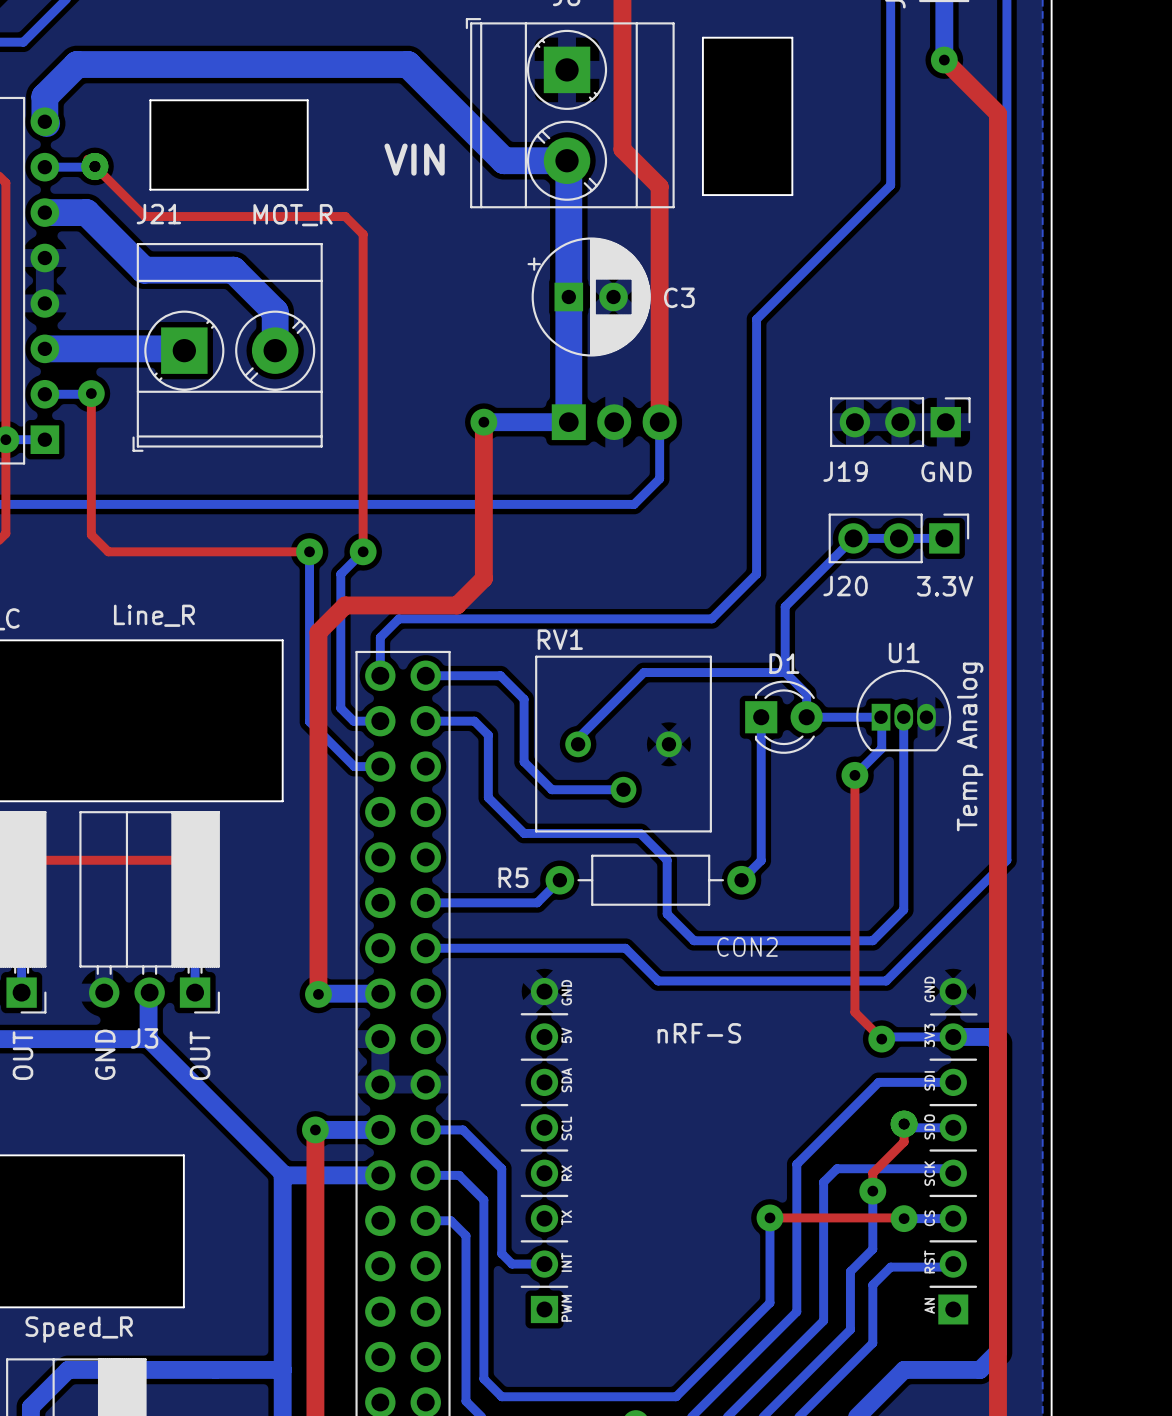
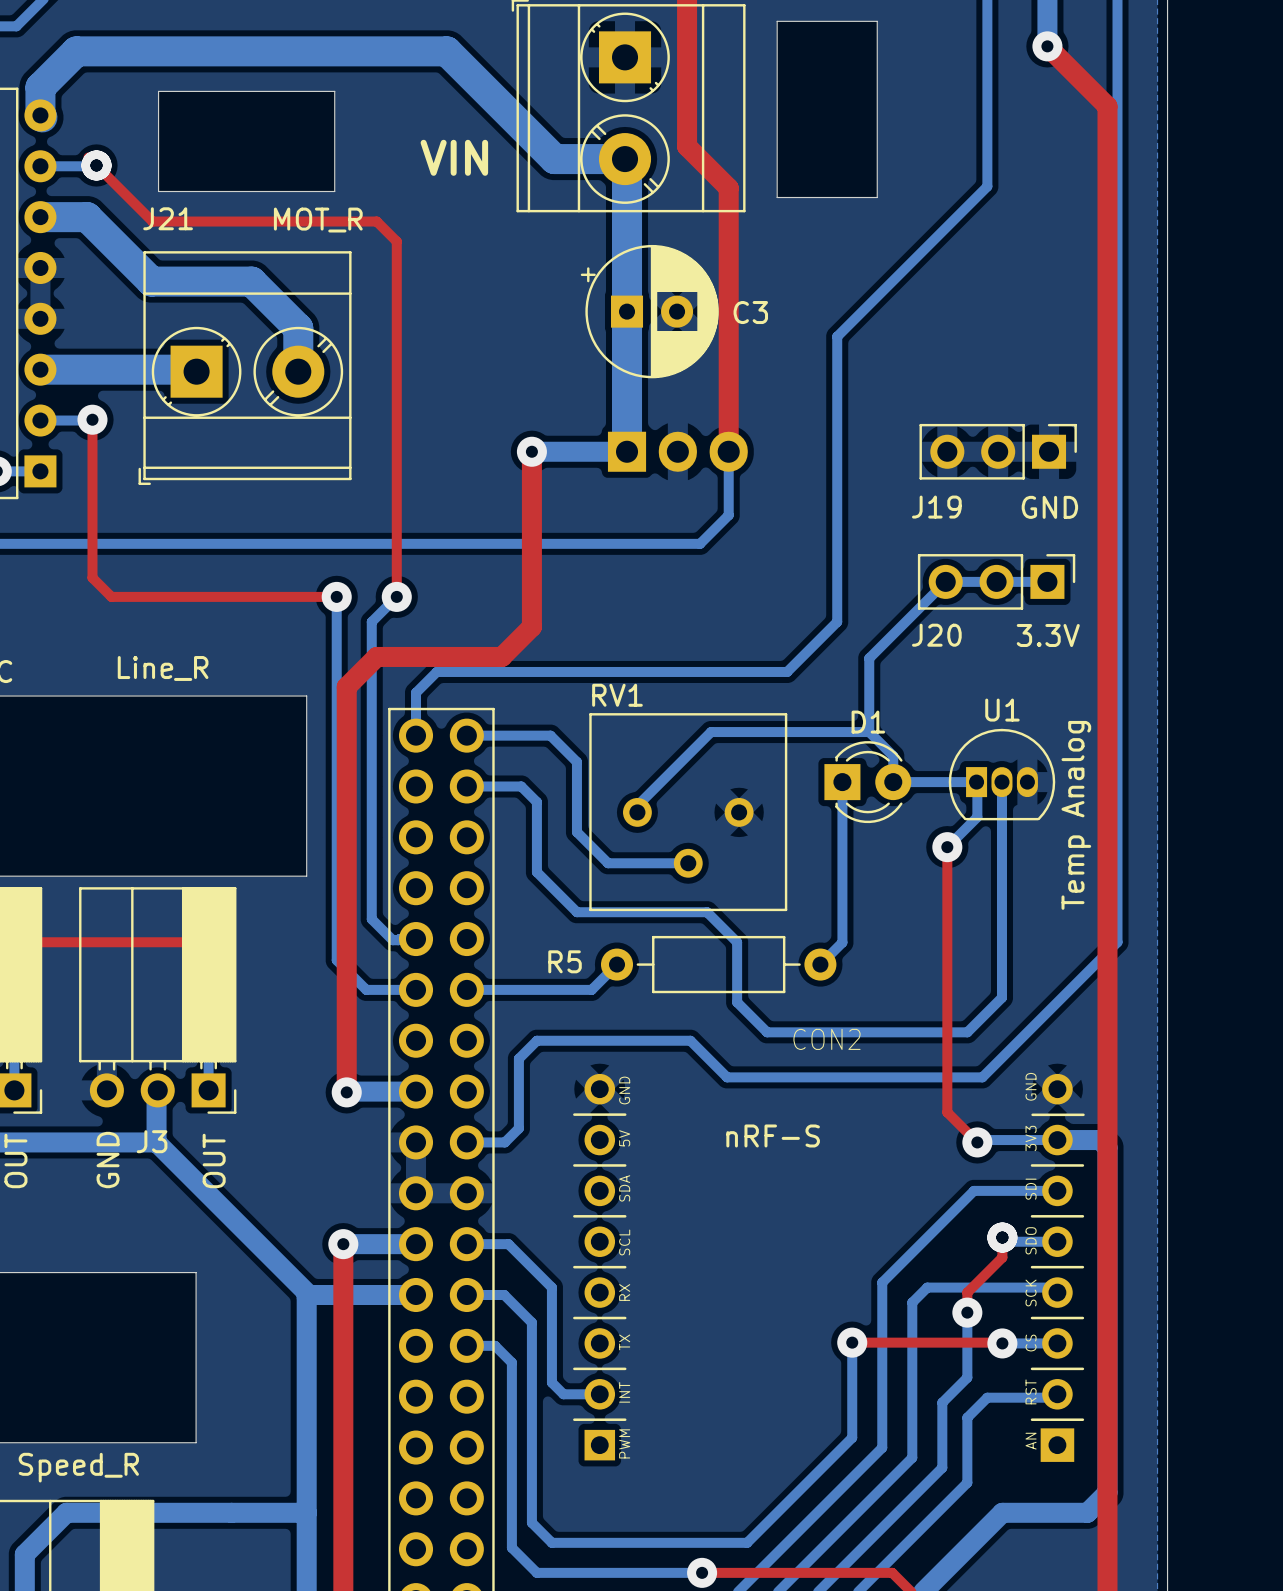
bottom track: (340, 708) (353, 721) (380, 721) -> (371, 772) (371, 919) (392, 940) (416, 939)
bottom track: (309, 721) (354, 766) (380, 766) -> (336, 787) (336, 960) (366, 989) (416, 989)
bottom track: (425, 948) (488, 948) -> (466, 1142) (504, 1142) (518, 1128) (518, 1058) (536, 1040)

